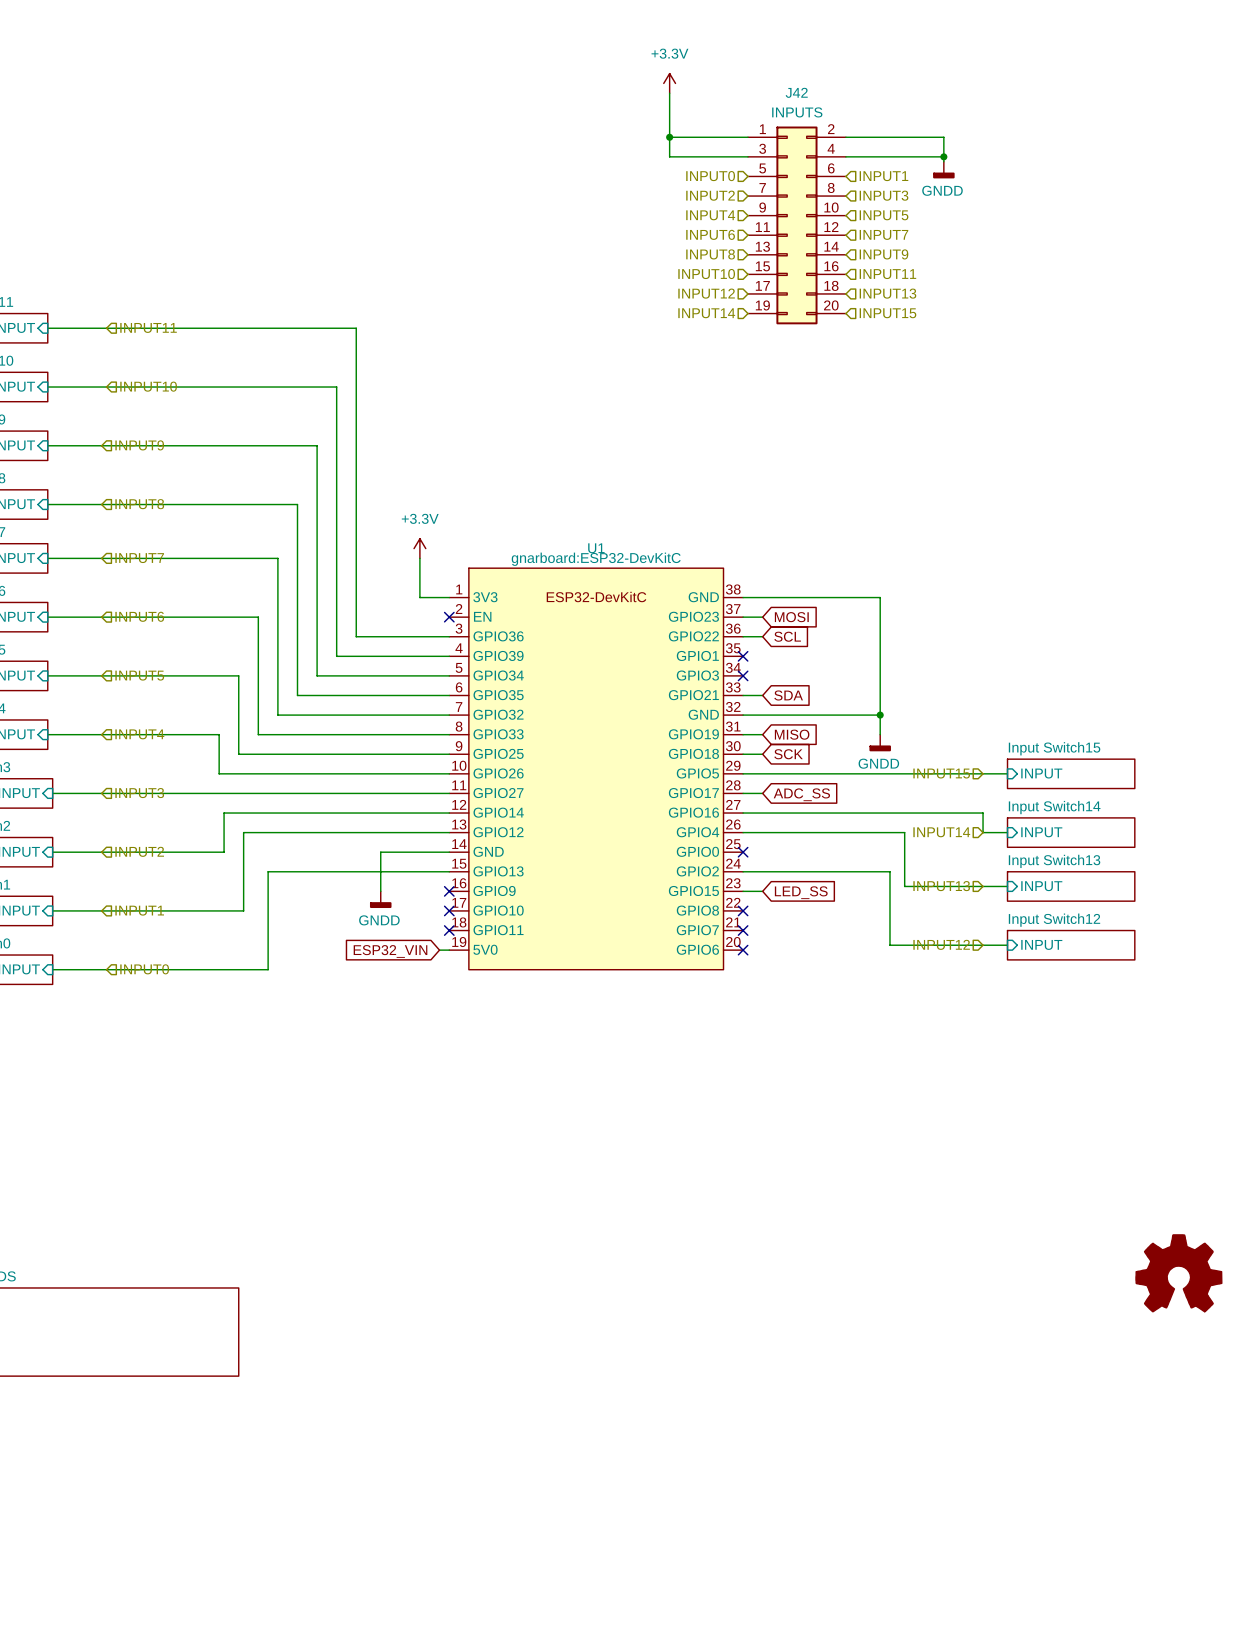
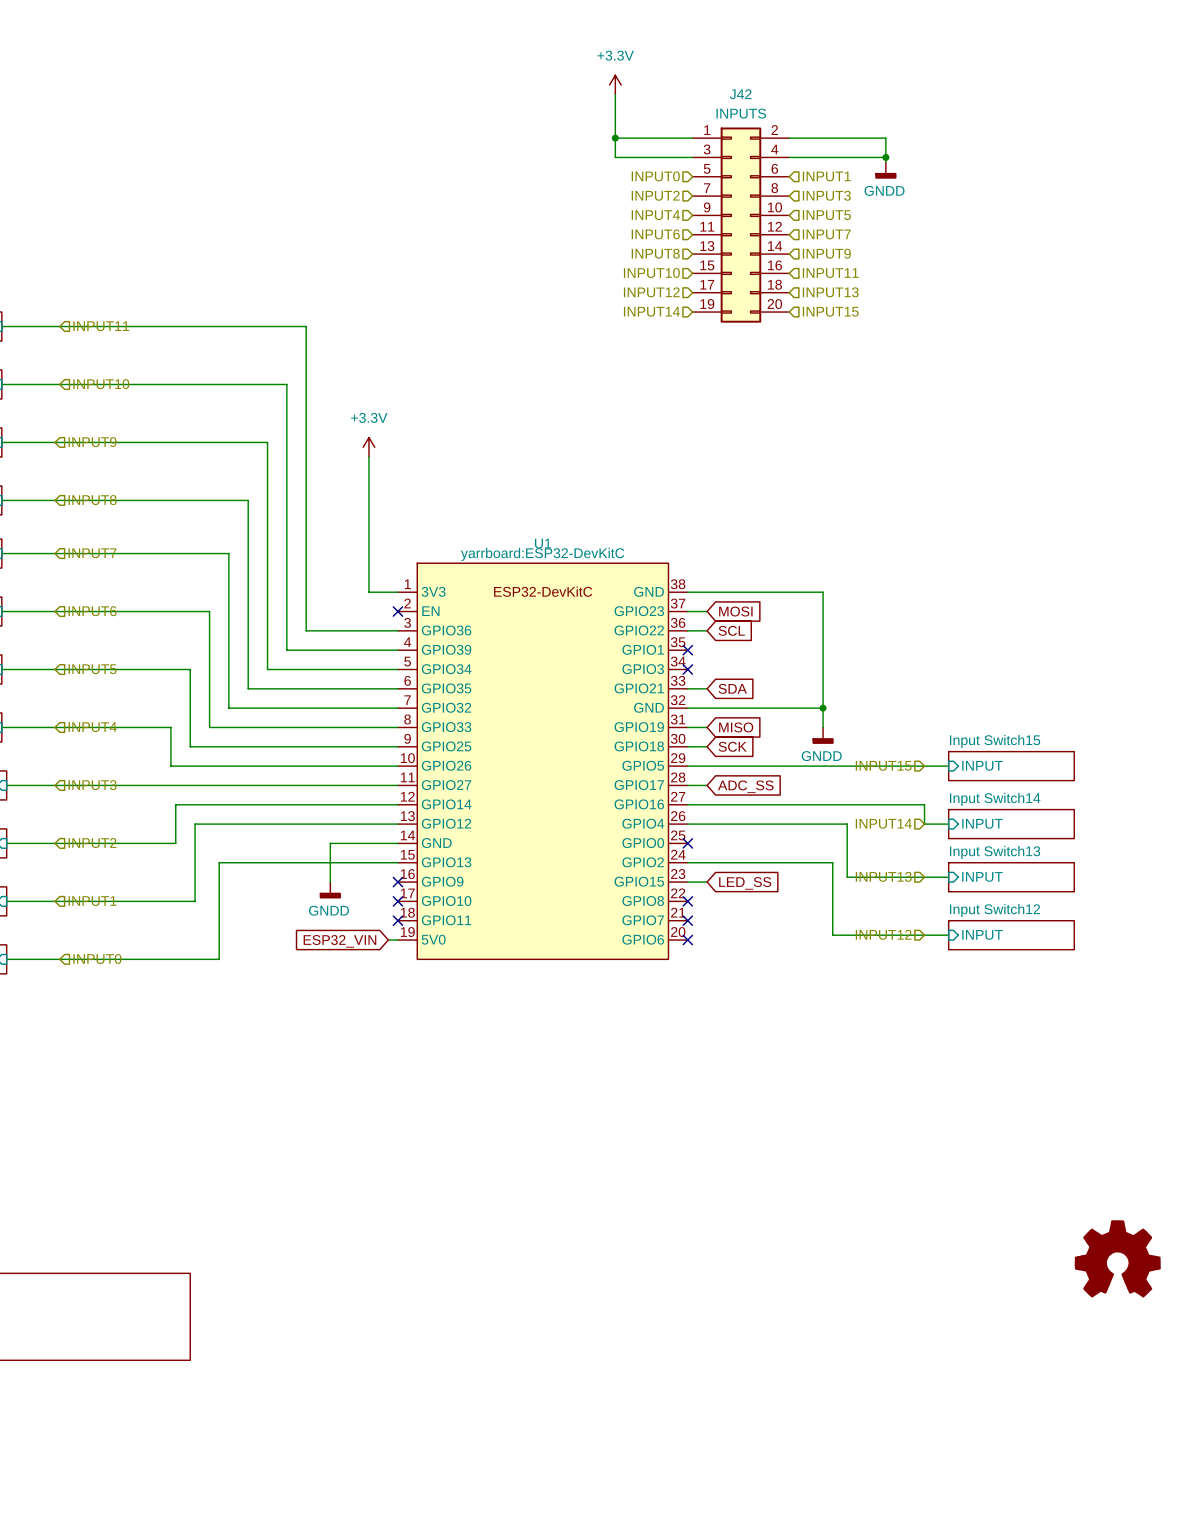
wire: none -> (368, 456) (368, 553)
power symbol position: +3.3V (419, 548) -> +3.3V (368, 447)
U1 text: gnarboard:ESP32-DevKitC (596, 559) -> yarrboard:ESP32-DevKitC (542, 554)

